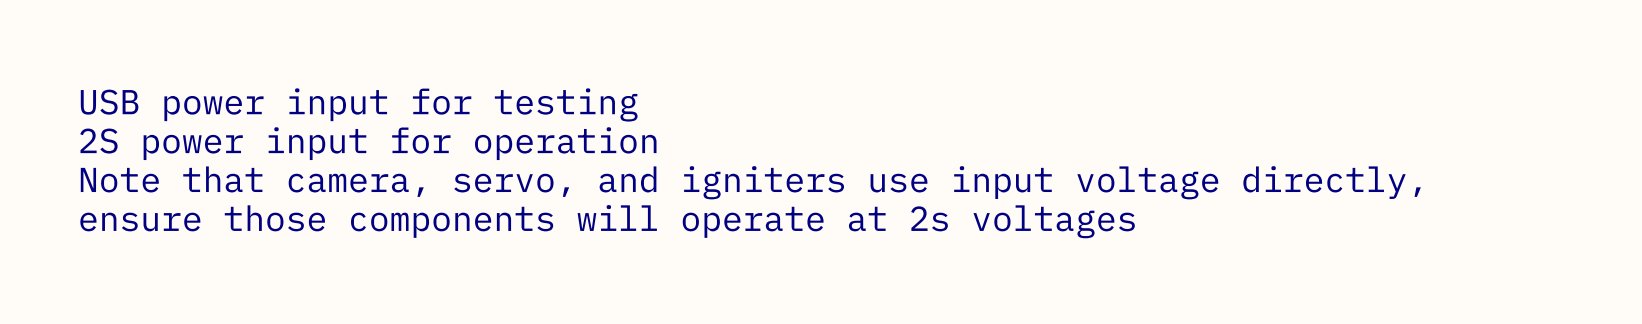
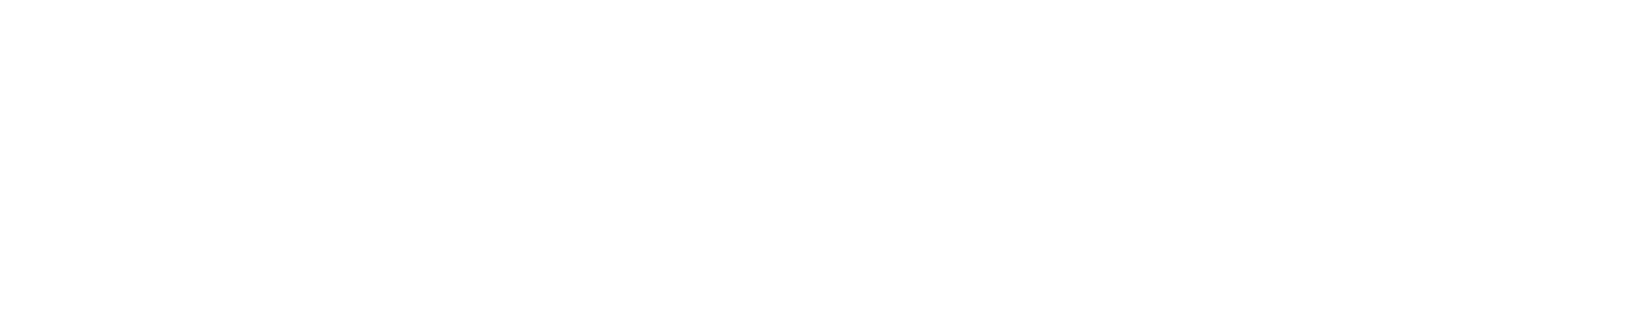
text: USB power input for testing (359, 104) -> none
text: 2S power input for operation (368, 143) -> none
text: Note that camera, servo, and igniters use input voltage directly, (750, 182) -> none
text: ensure those components will operate at 2s voltages (607, 221) -> none

